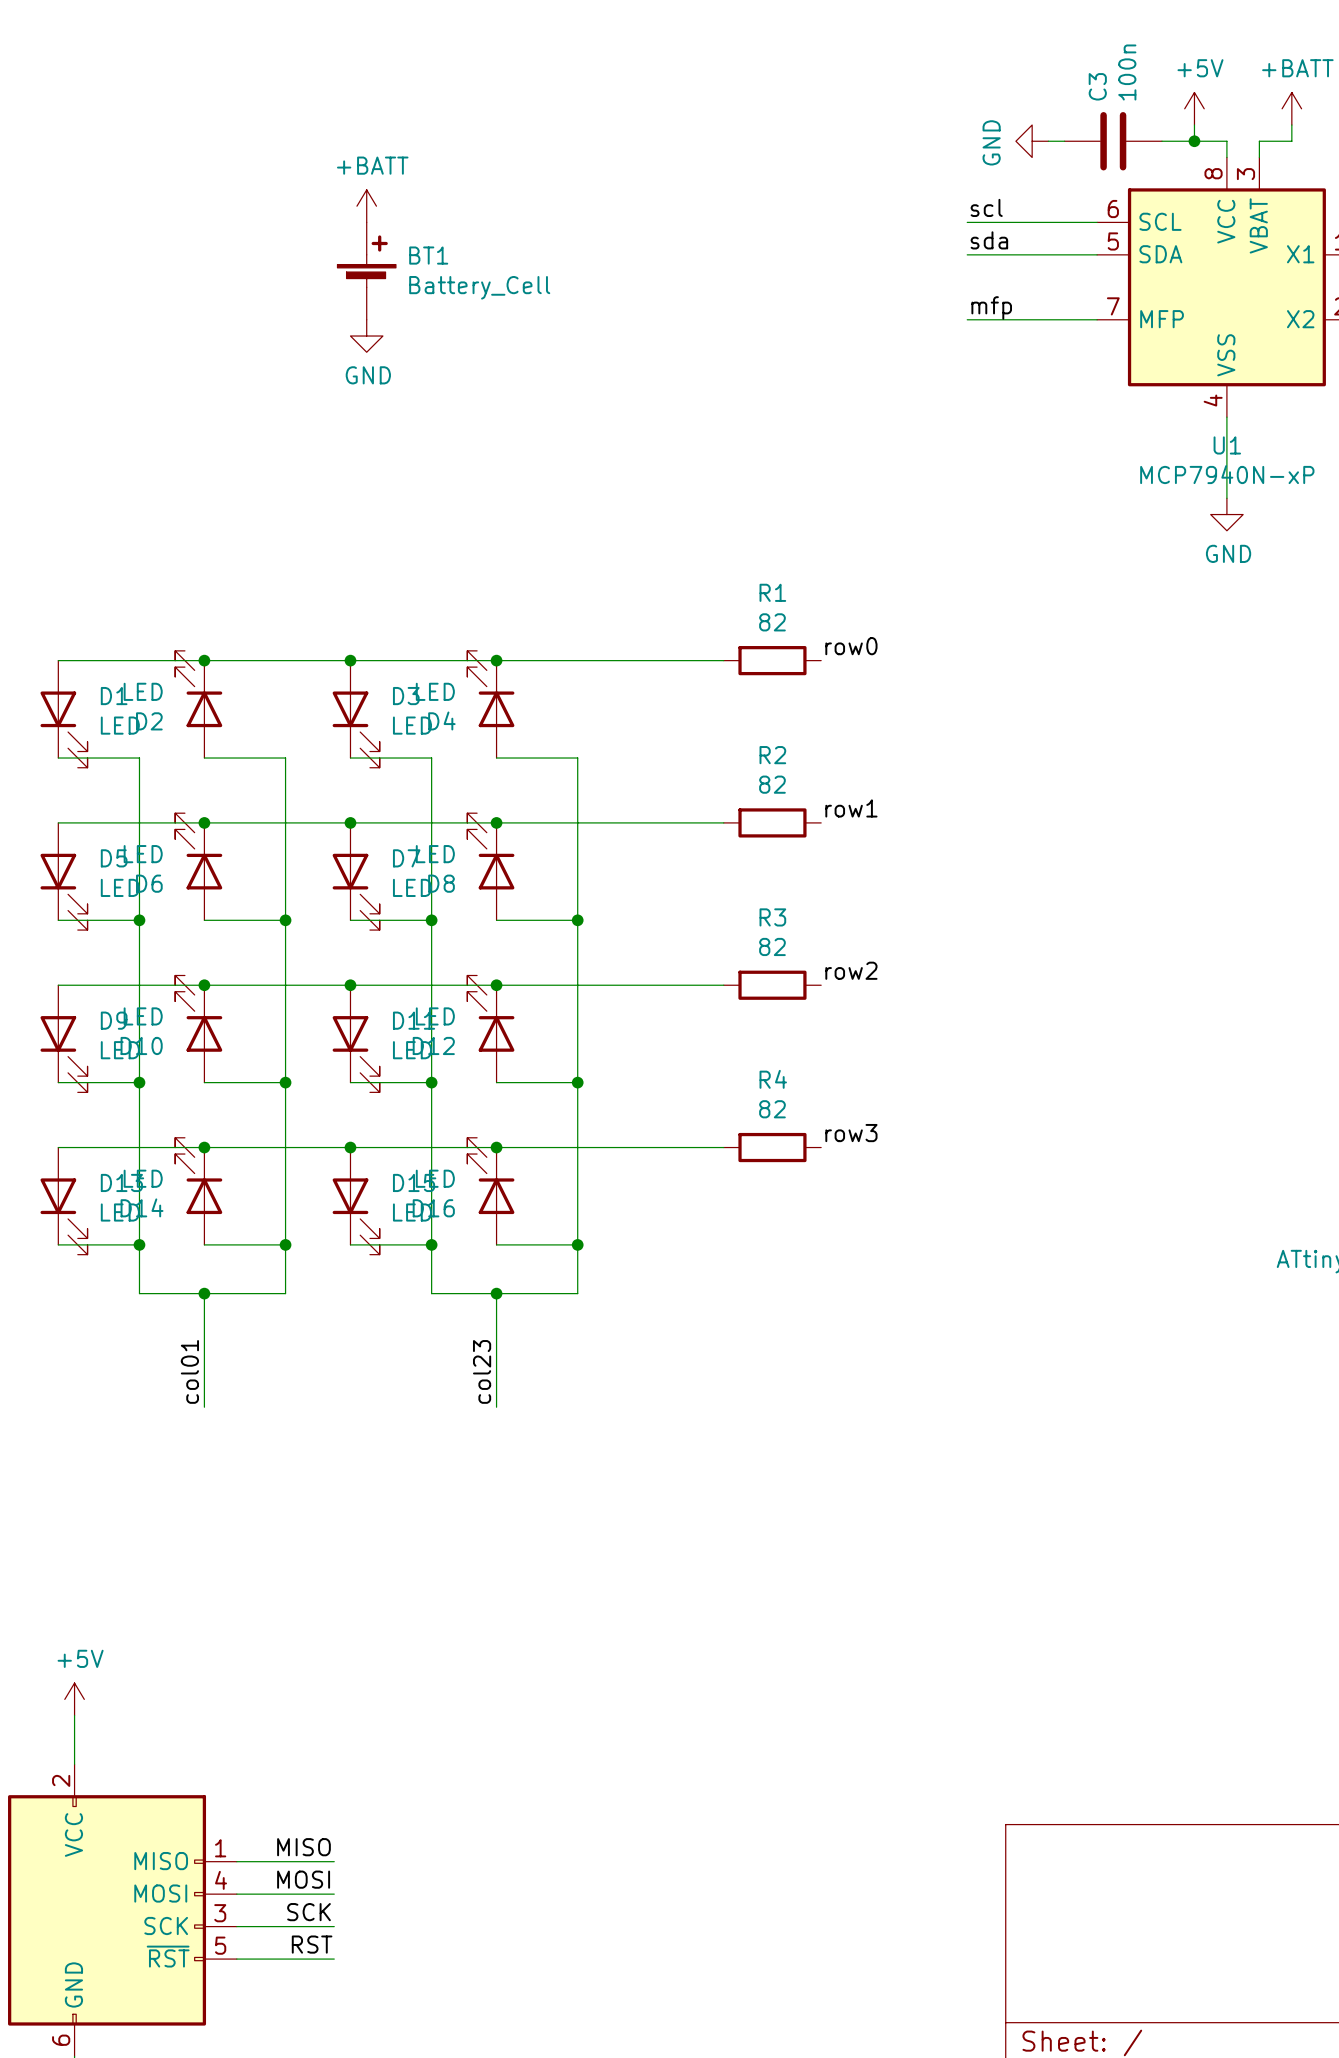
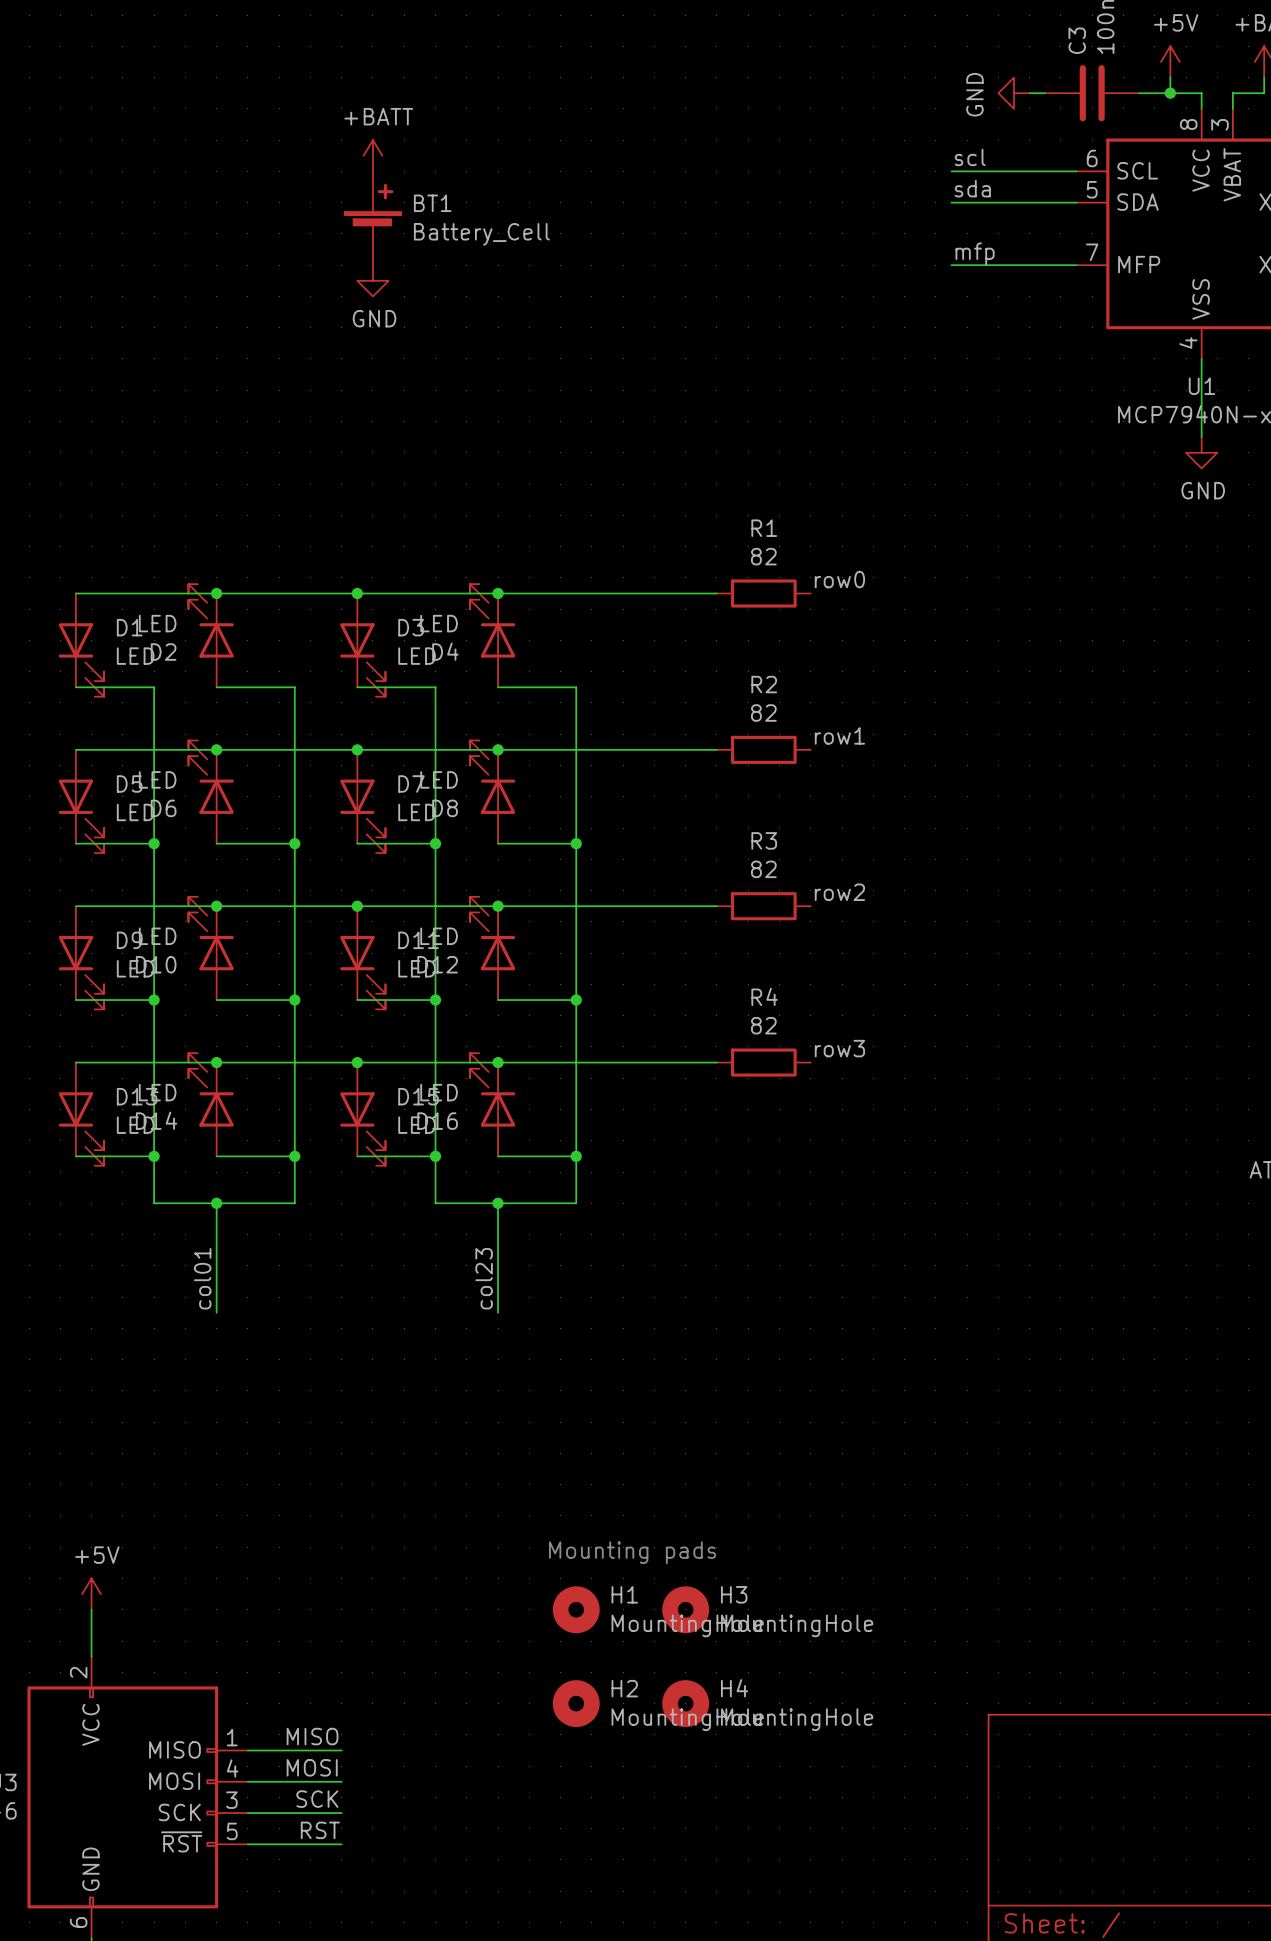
text: none -> Mounting pads (632, 1552)
H1: none -> MountingHole (576, 1609)
H3: none -> MountingHole (685, 1609)
H2: none -> MountingHole (576, 1703)
H4: none -> MountingHole (685, 1703)

